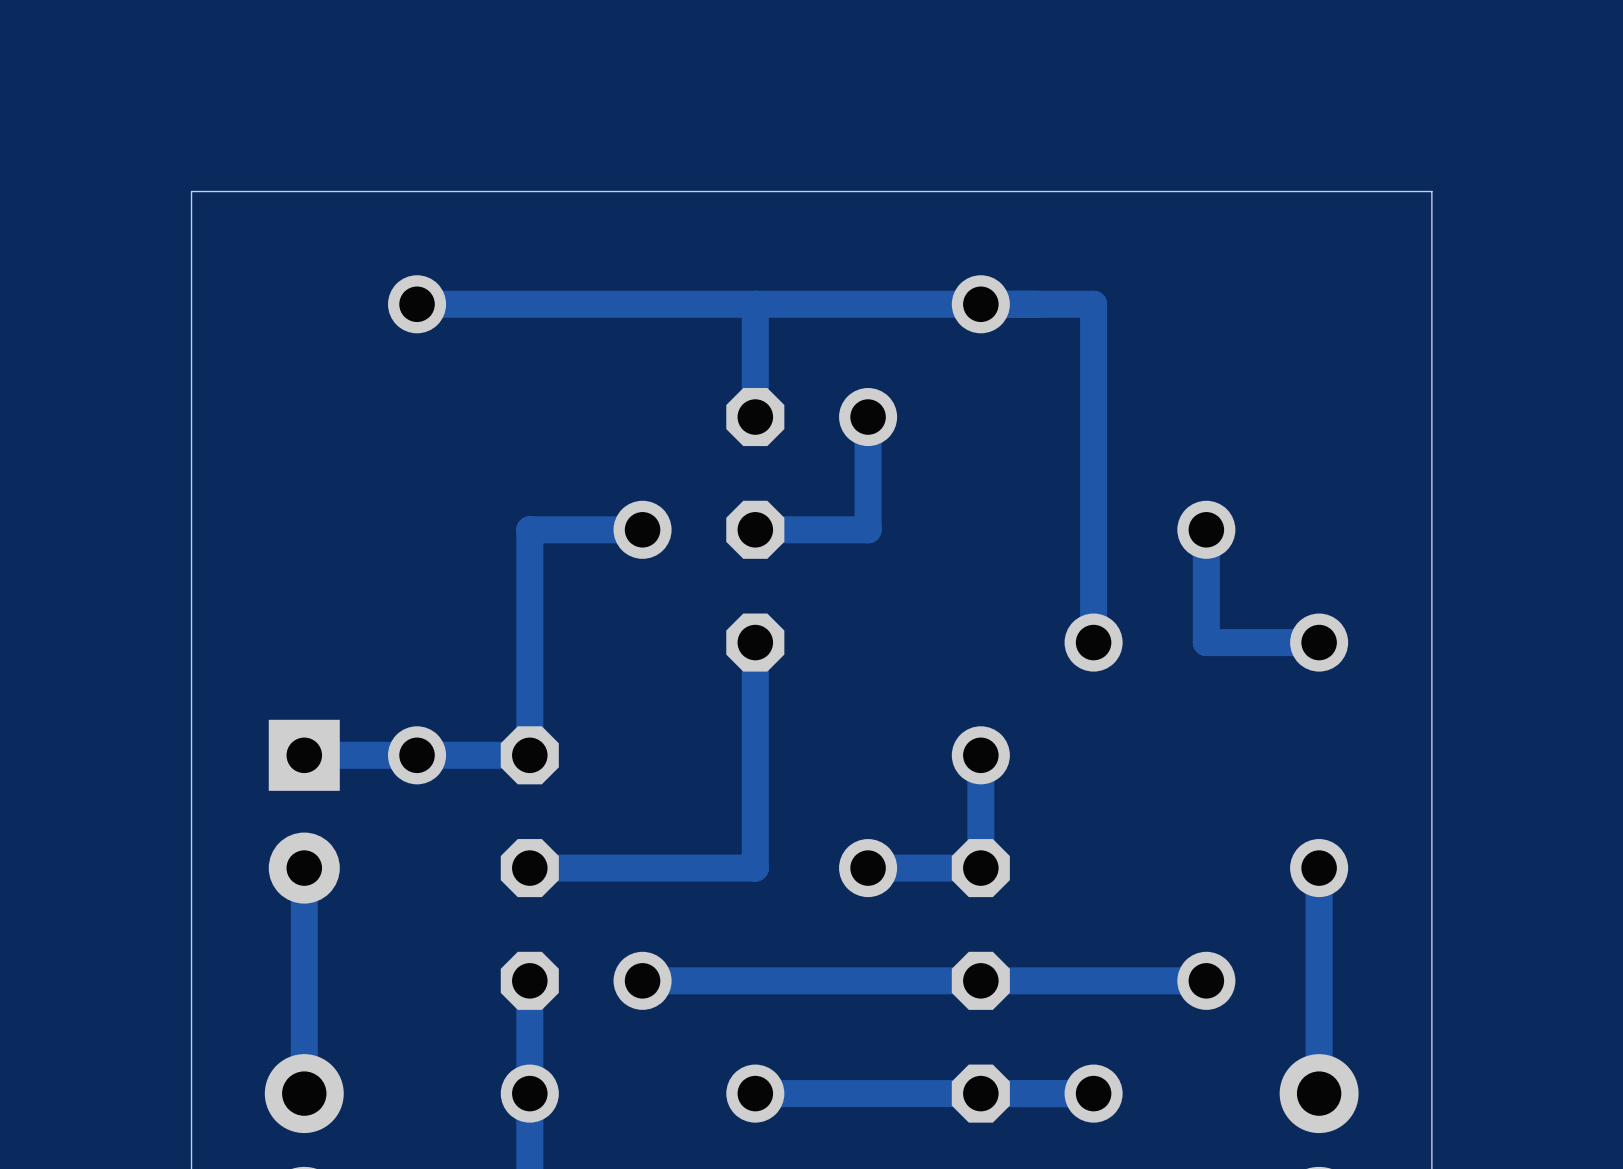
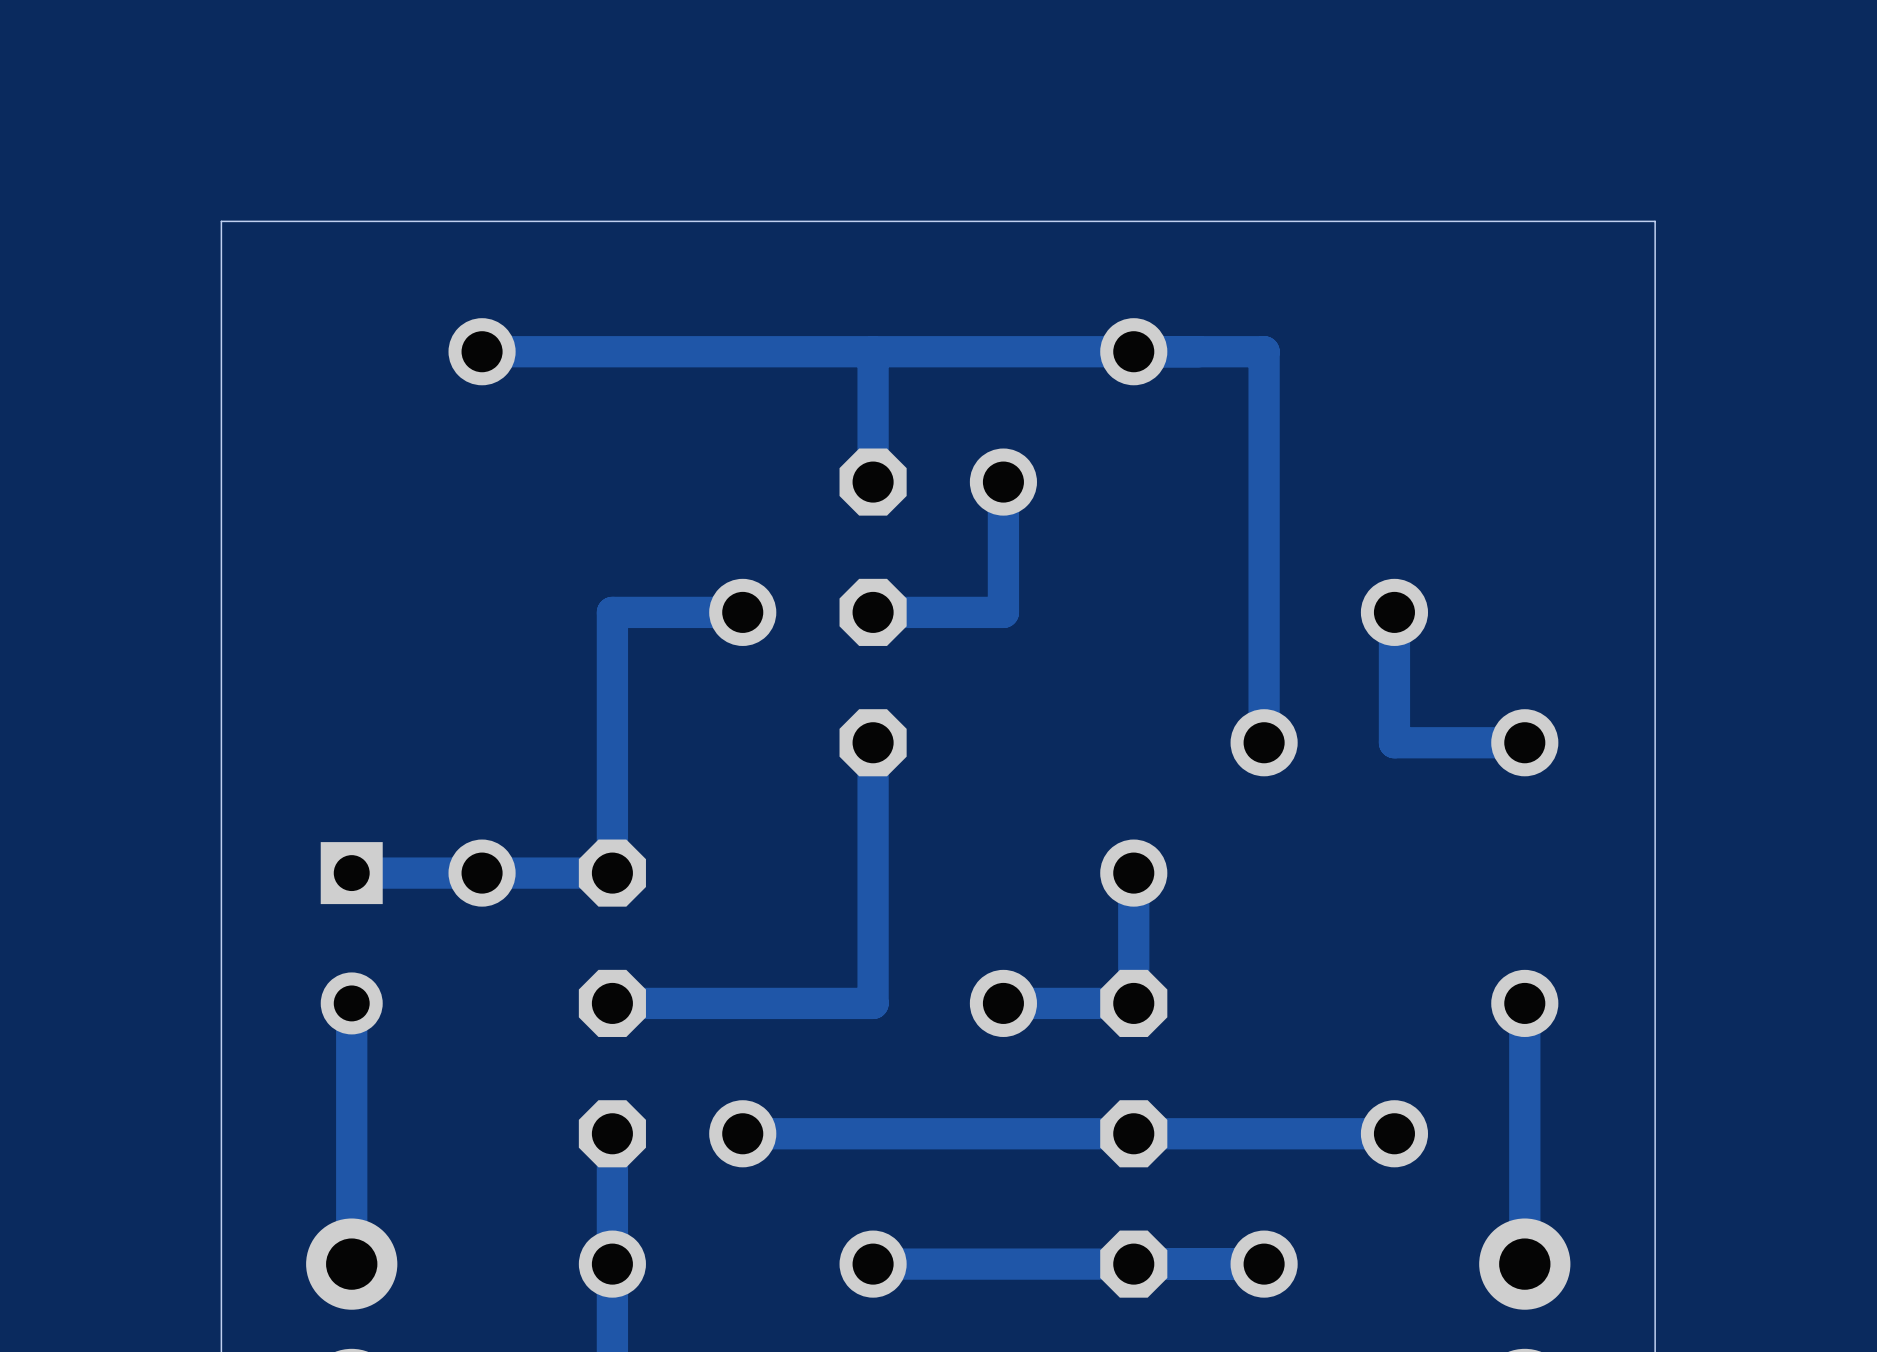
part footprint: [268, 719, 340, 904] -> [320, 842, 383, 1035]

